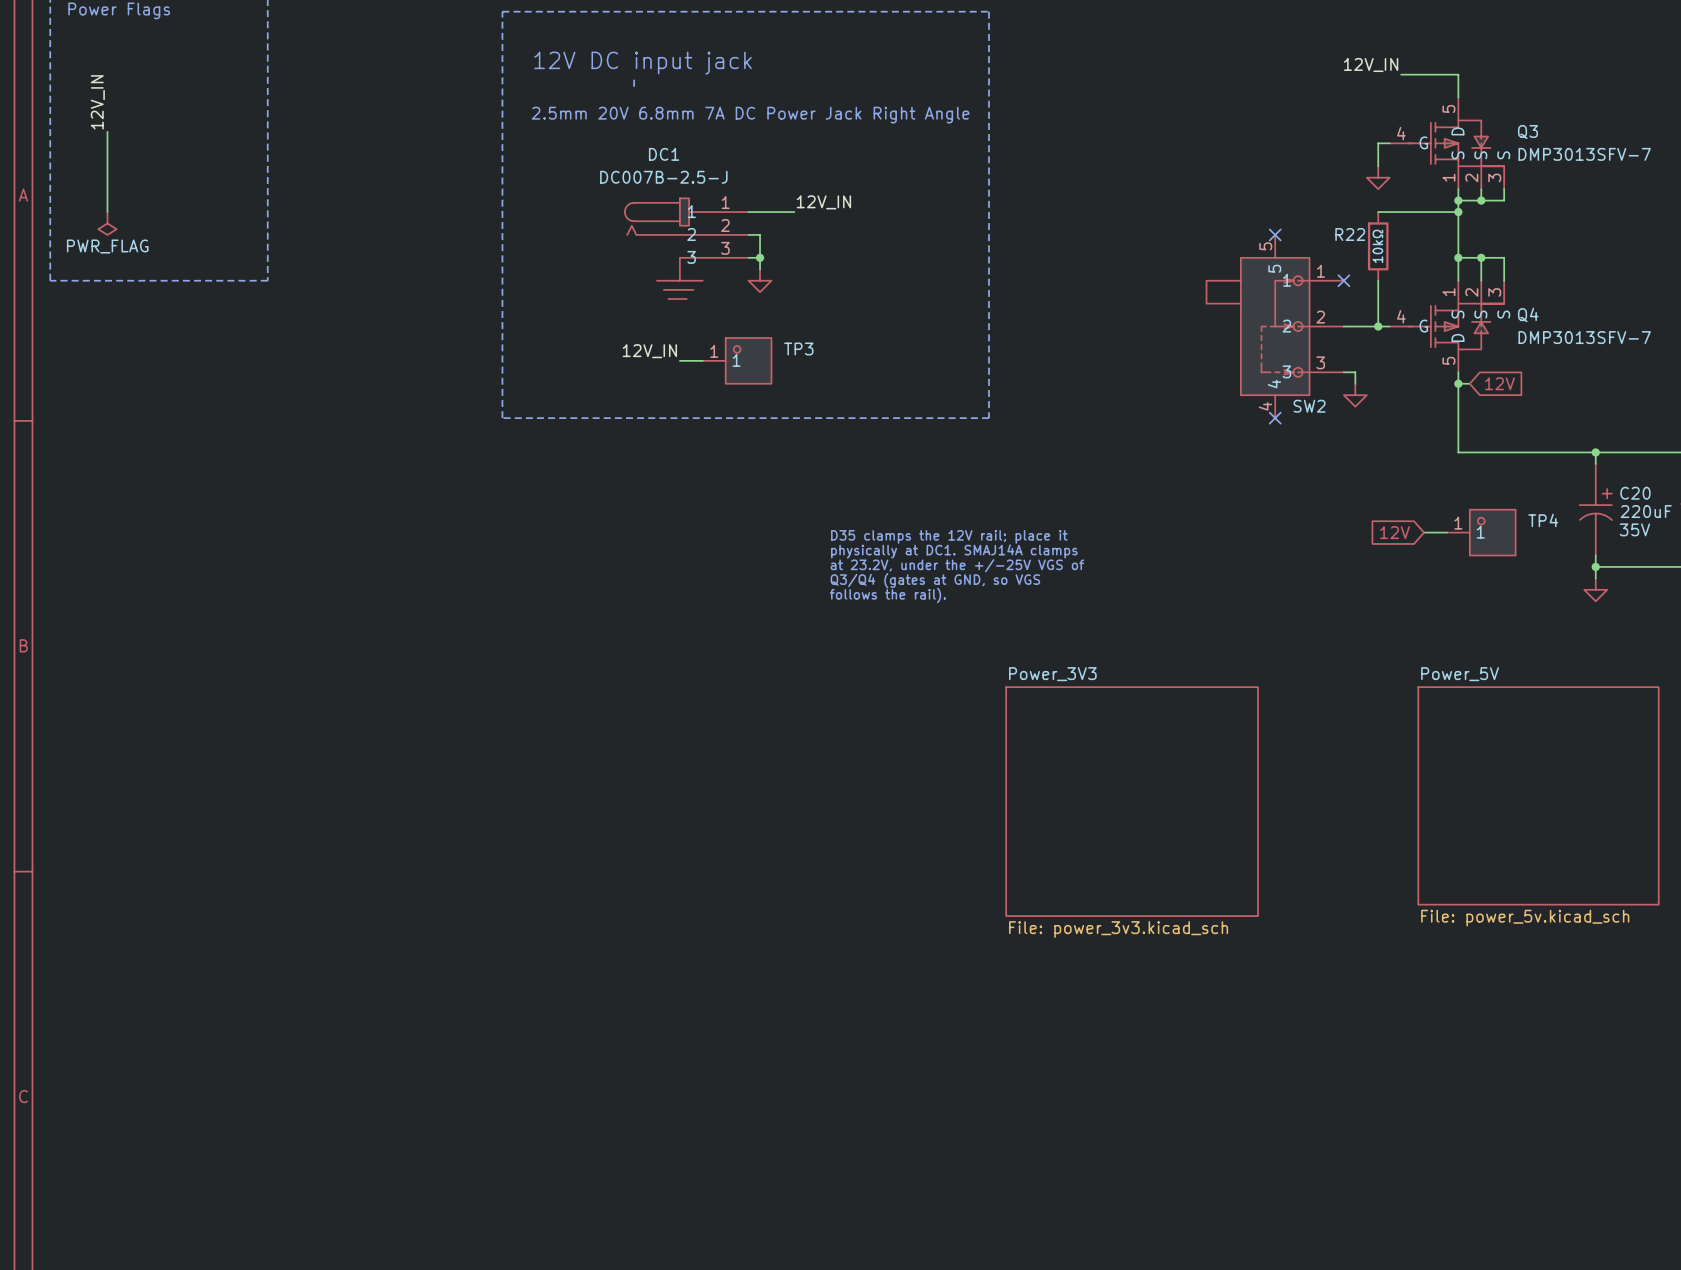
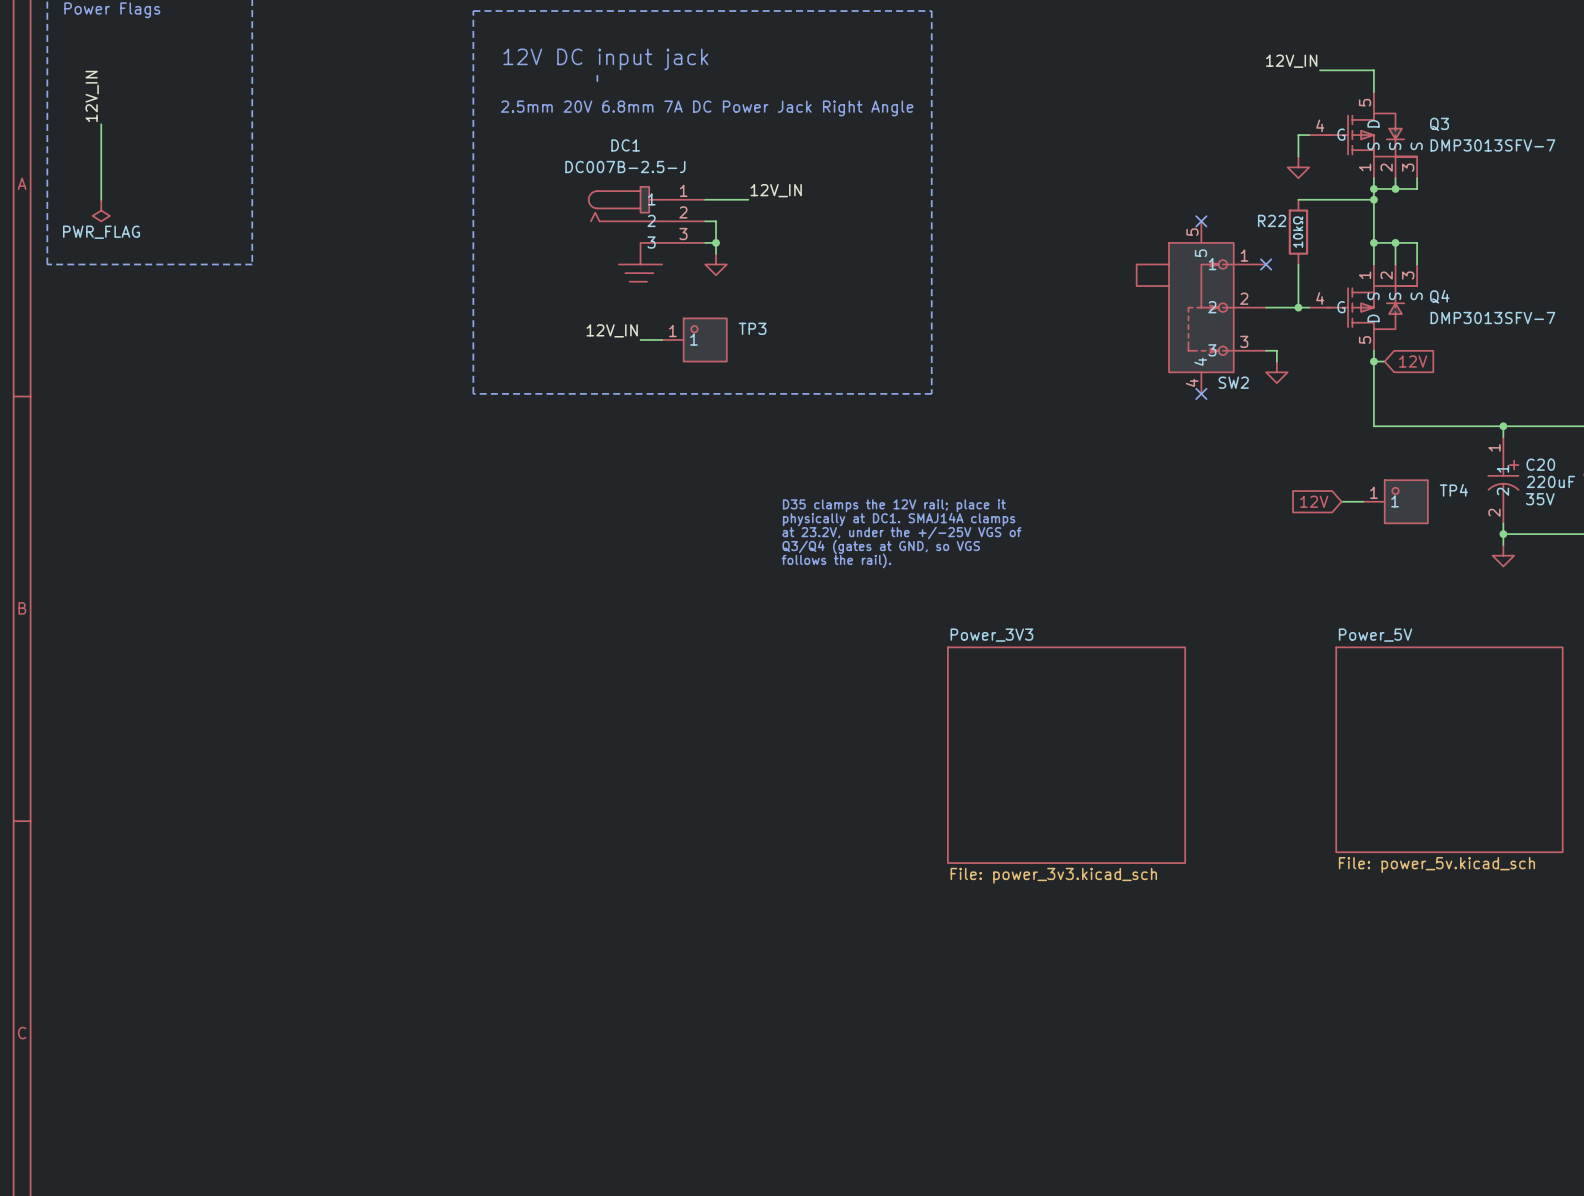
C20 pin number: none -> 1 (1494, 447)
C20 pin name: none -> 1 (1502, 468)
C20 pin name: none -> 2 (1502, 491)
C20 pin number: none -> 2 (1494, 512)

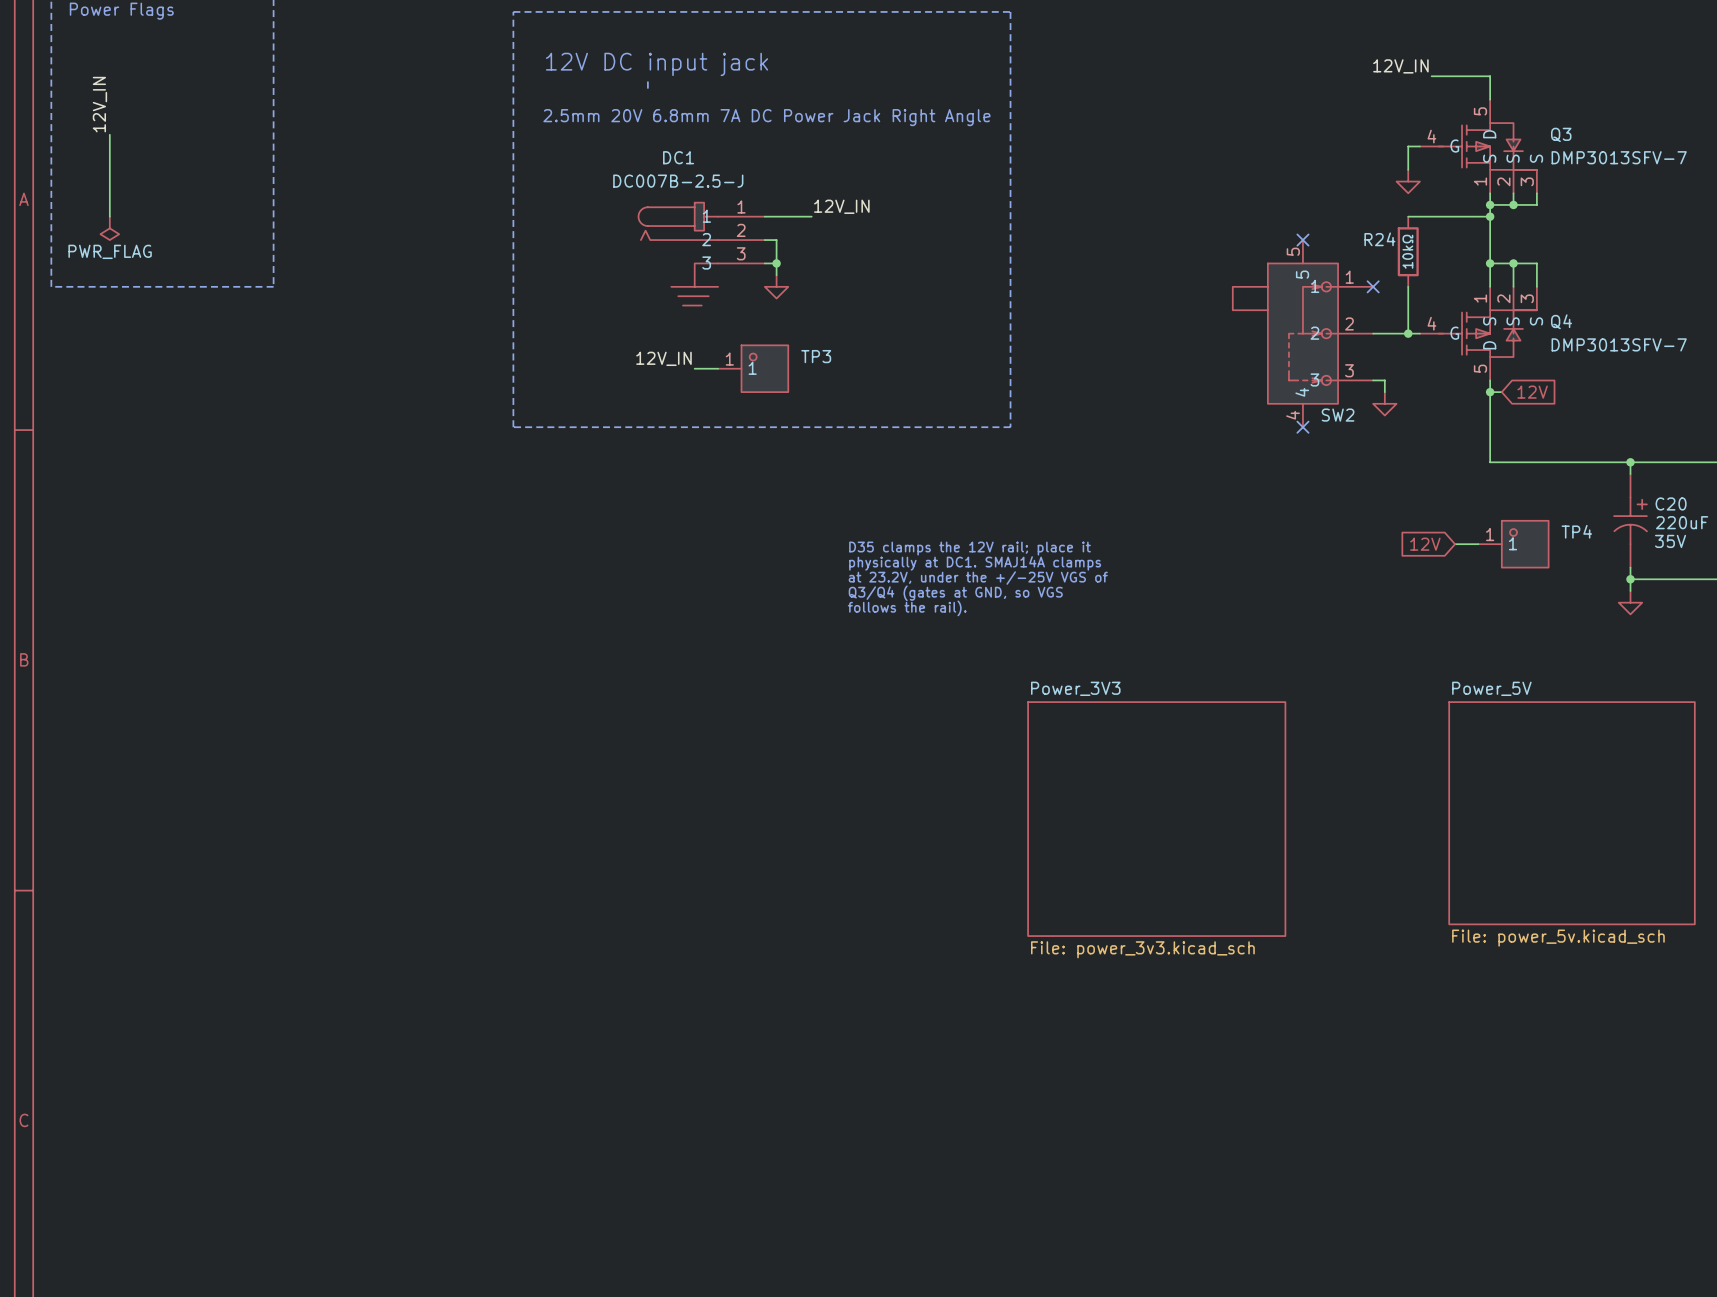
R22 name: R22 (1272, 220) -> R24 (1379, 239)
C20 pin number: 1 (1494, 447) -> none
C20 pin name: 1 (1502, 468) -> none
C20 pin name: 2 (1502, 491) -> none
C20 pin number: 2 (1494, 512) -> none

